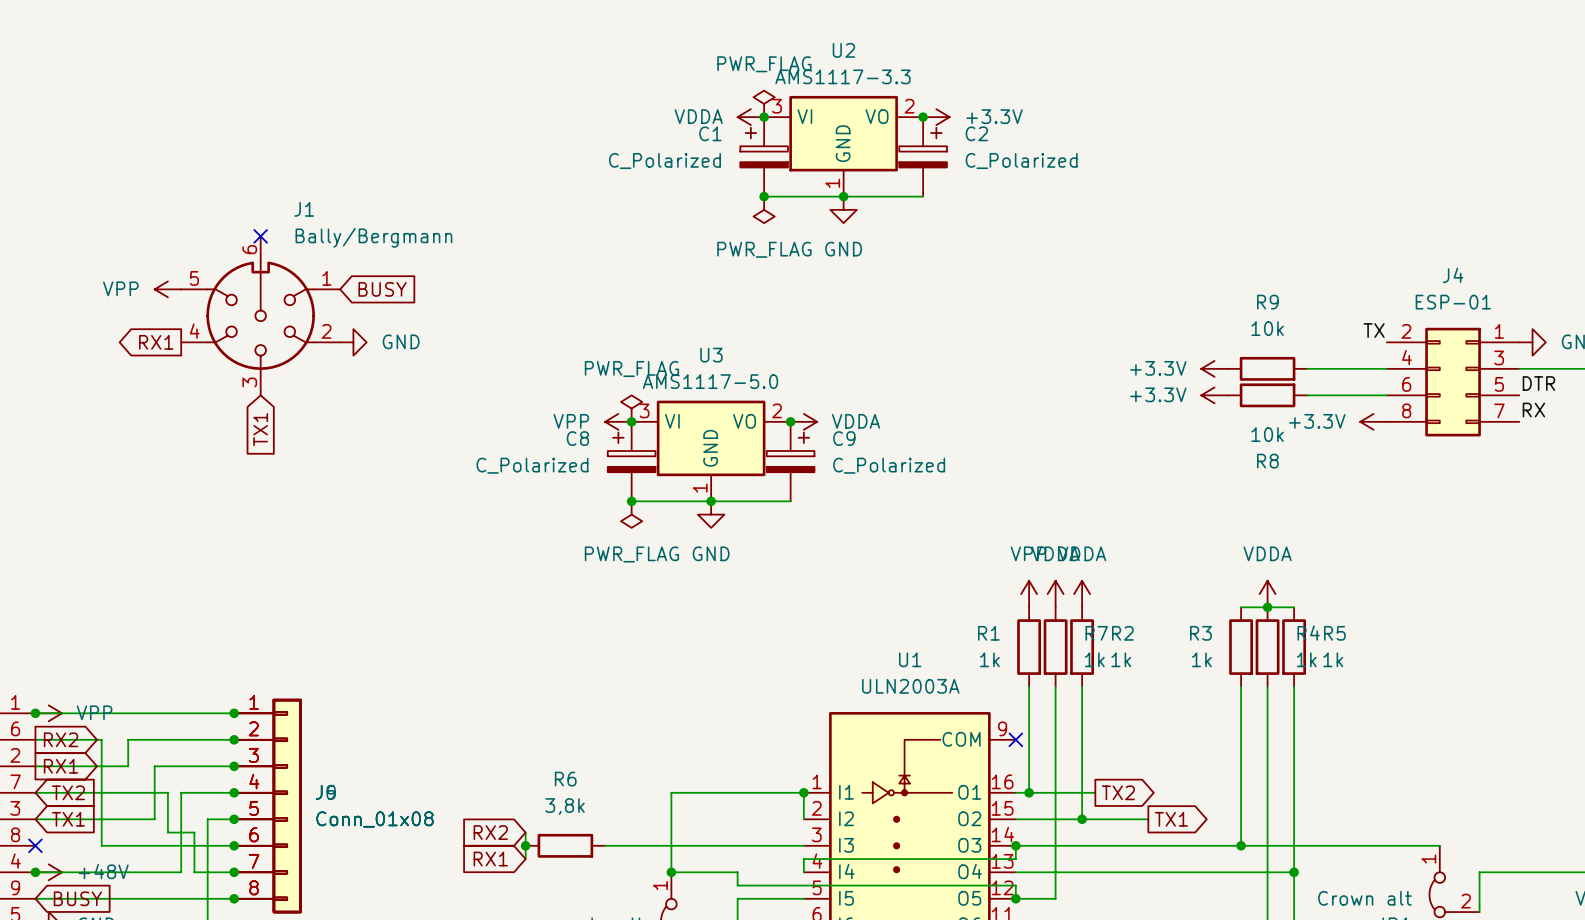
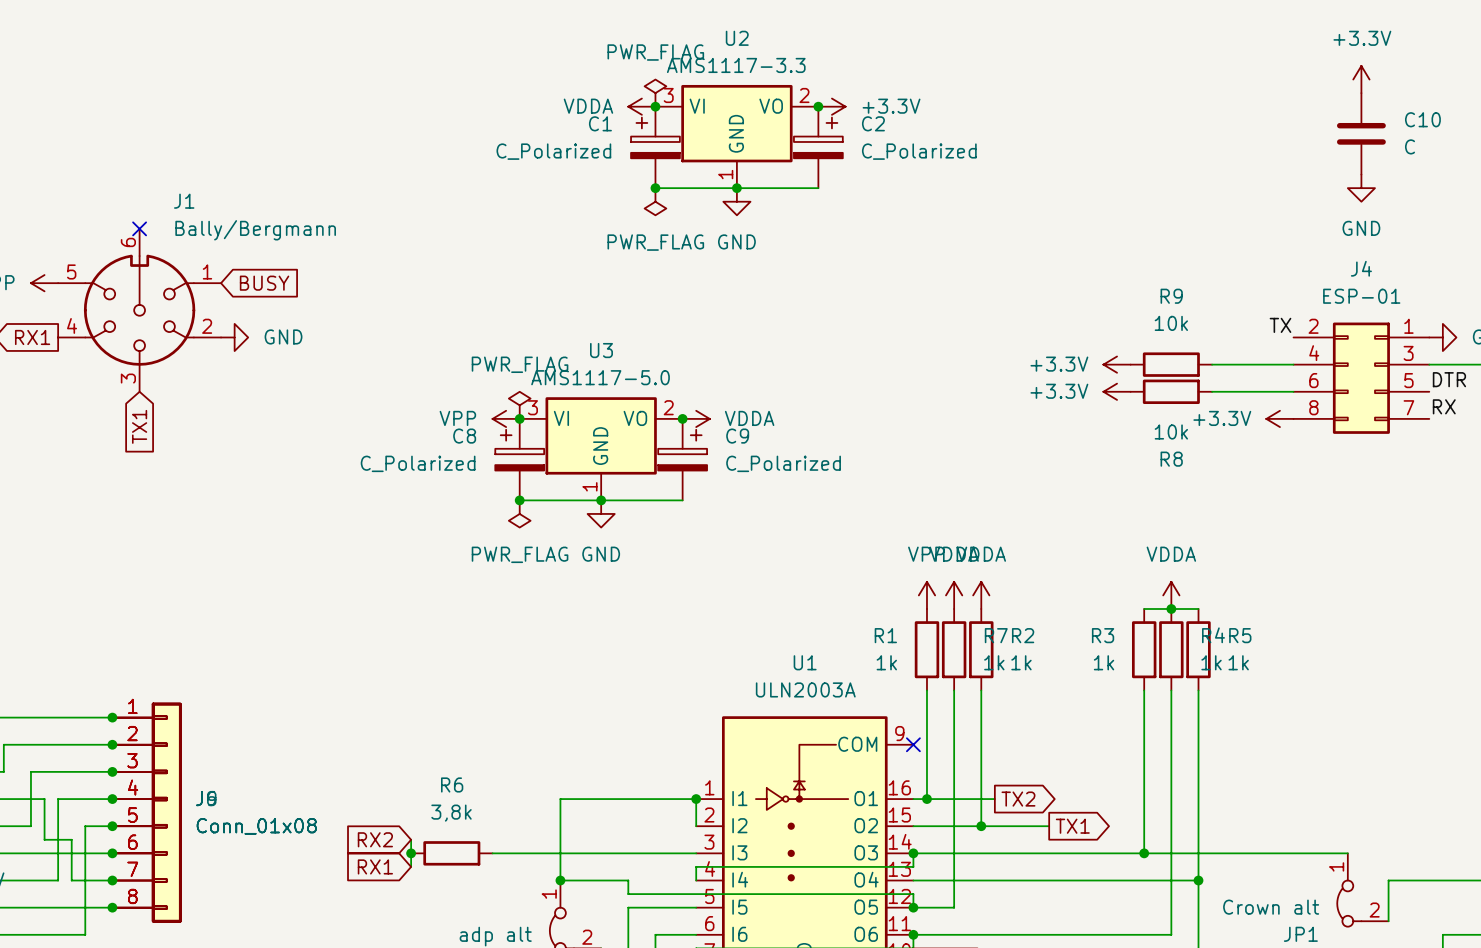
power symbol: none -> +3.3V (1361, 79)
C10: none -> C (1361, 133)
power symbol: none -> GND (1361, 188)

